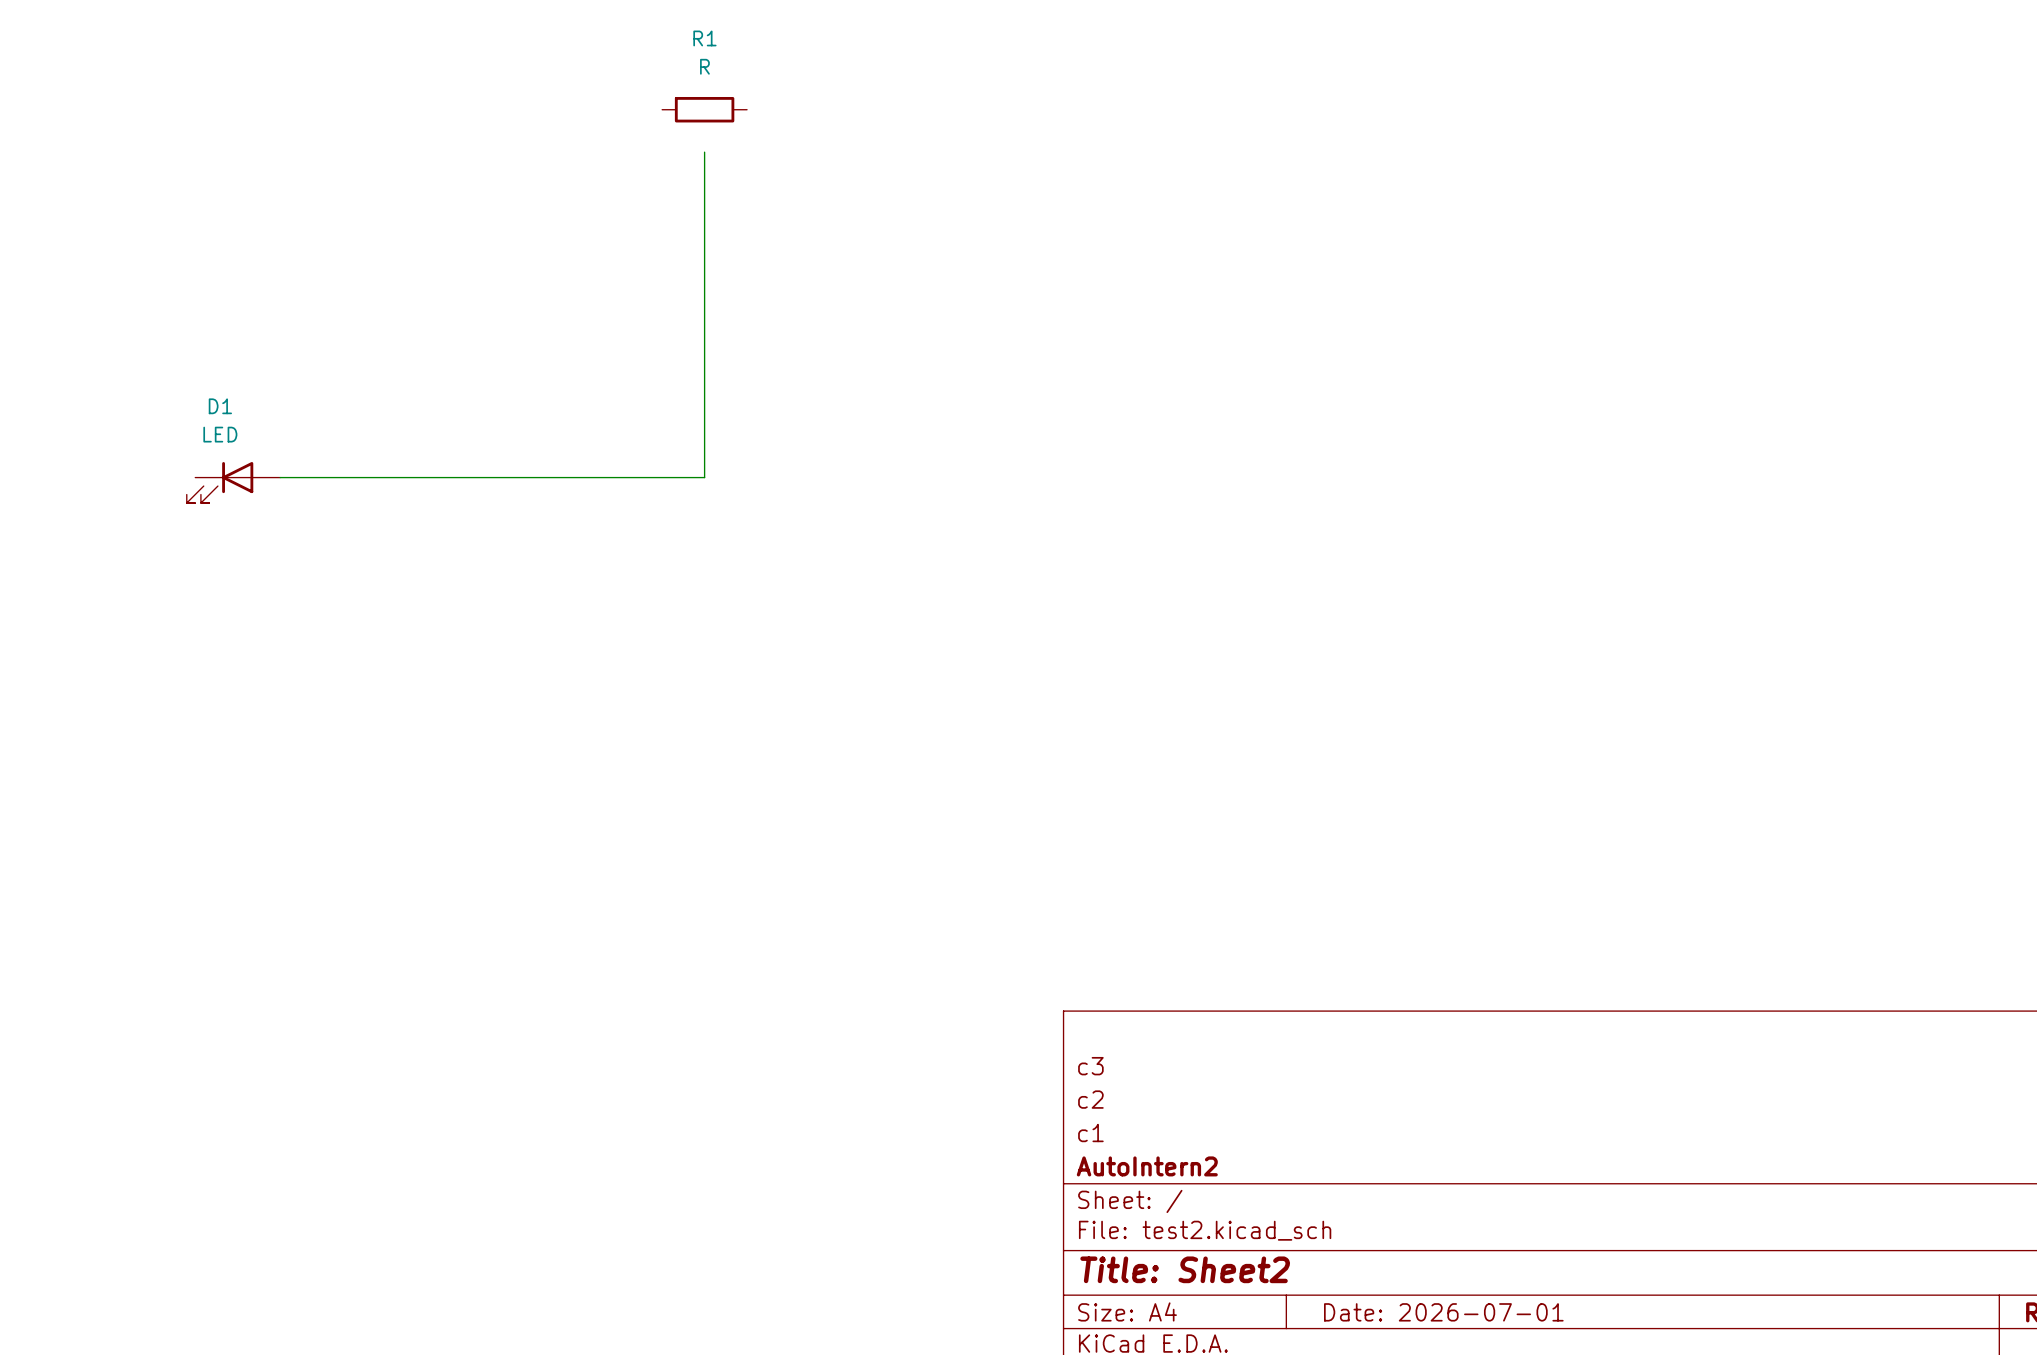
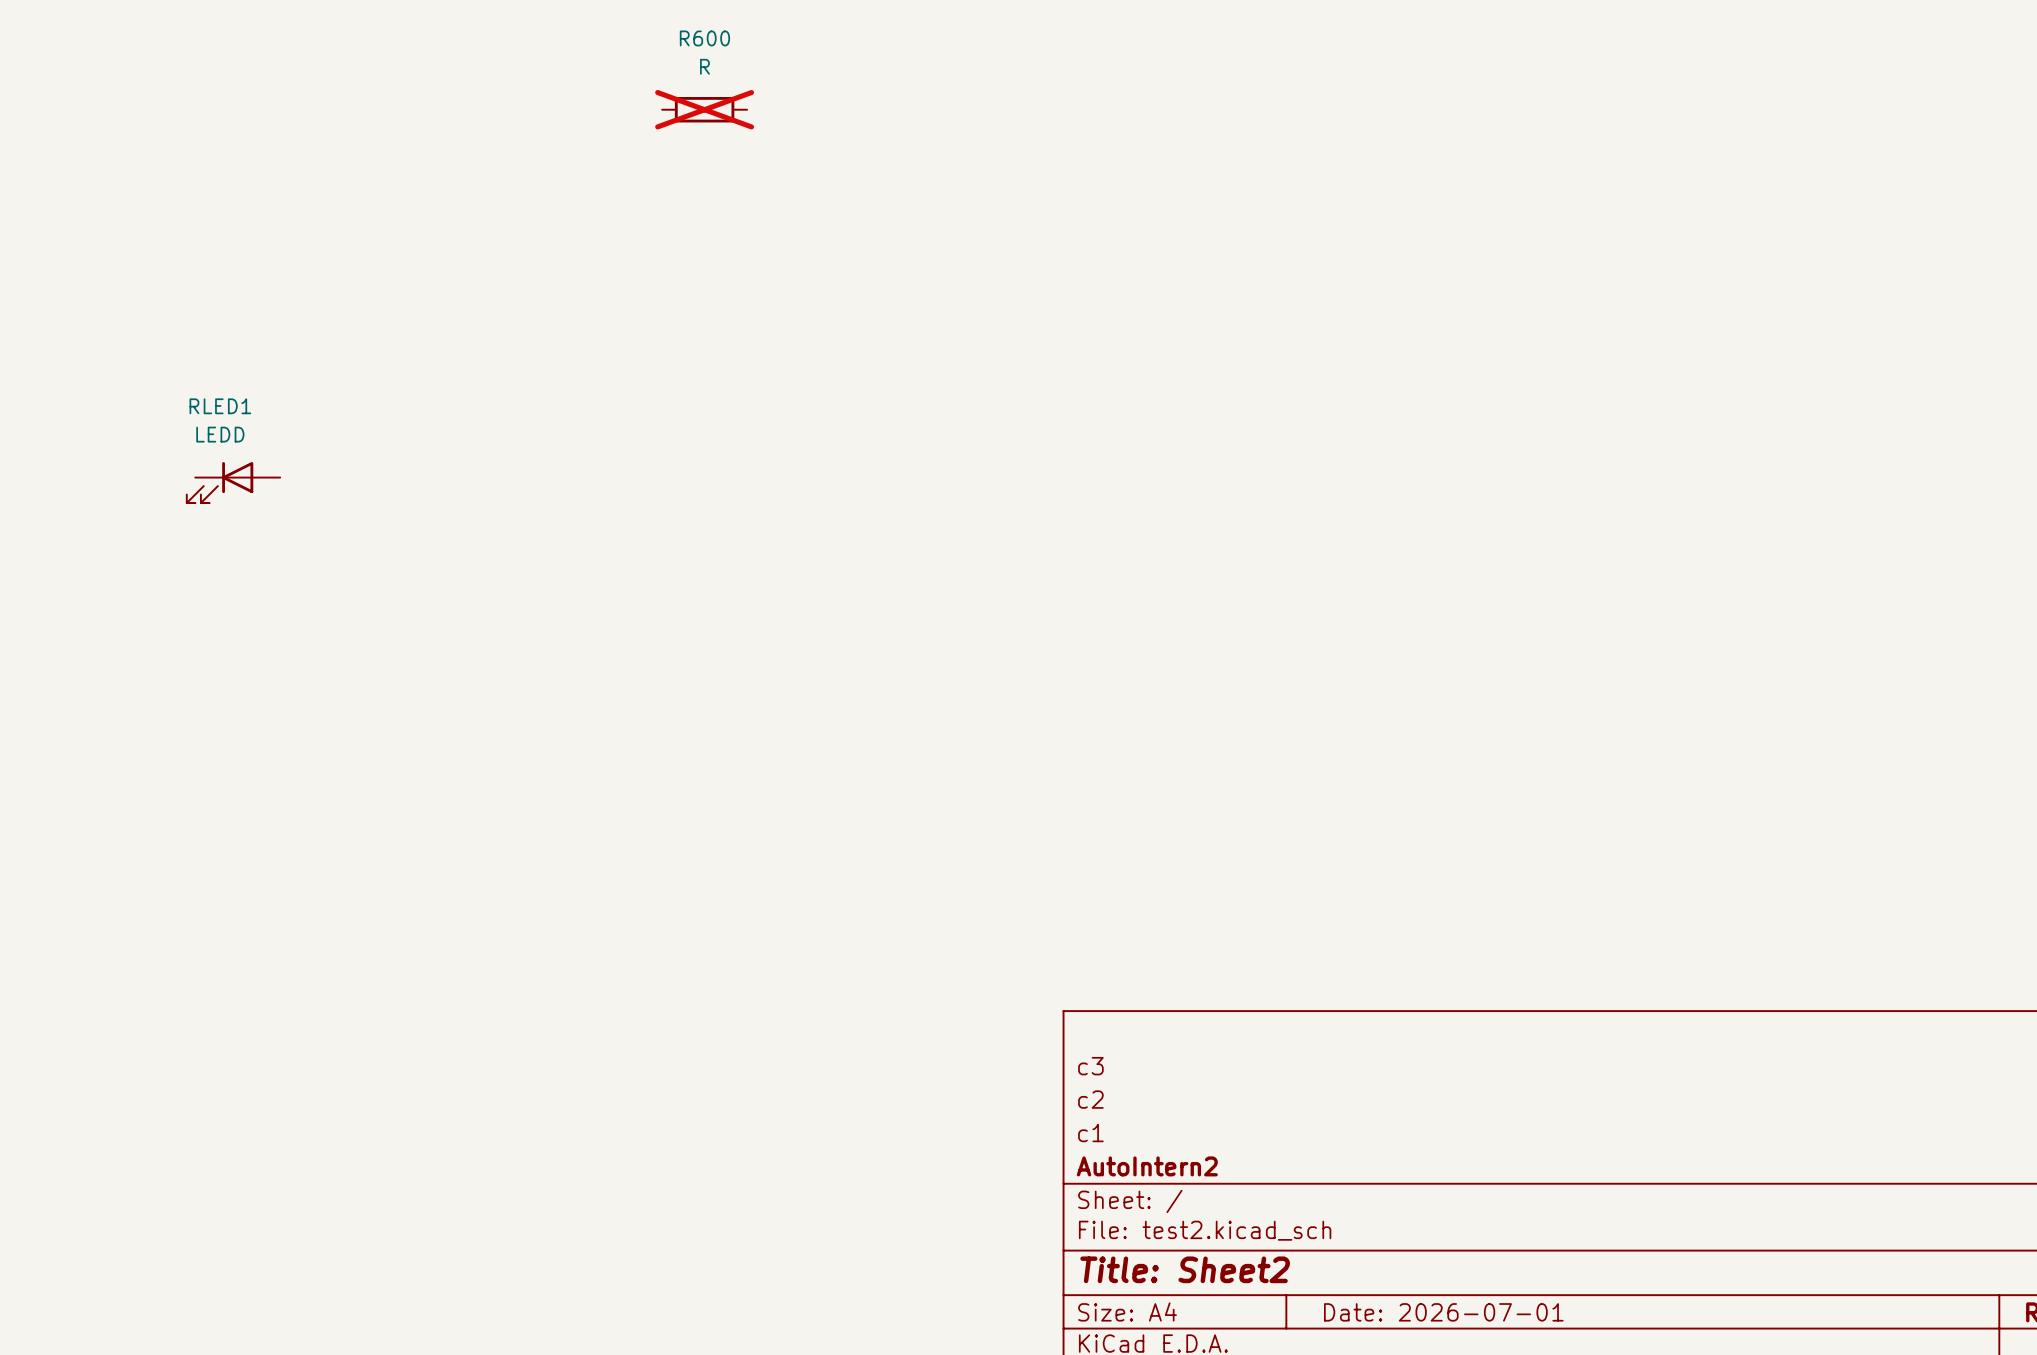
R1 name: R1 (704, 38) -> R600 (704, 38)
R1 do-not-place cross: none -> (704, 109)
wire: (704, 152) (704, 477) (280, 477) -> none
D1 name: D1 (220, 406) -> RLED1 (220, 406)
D1 value: LED (220, 434) -> LEDD (220, 434)

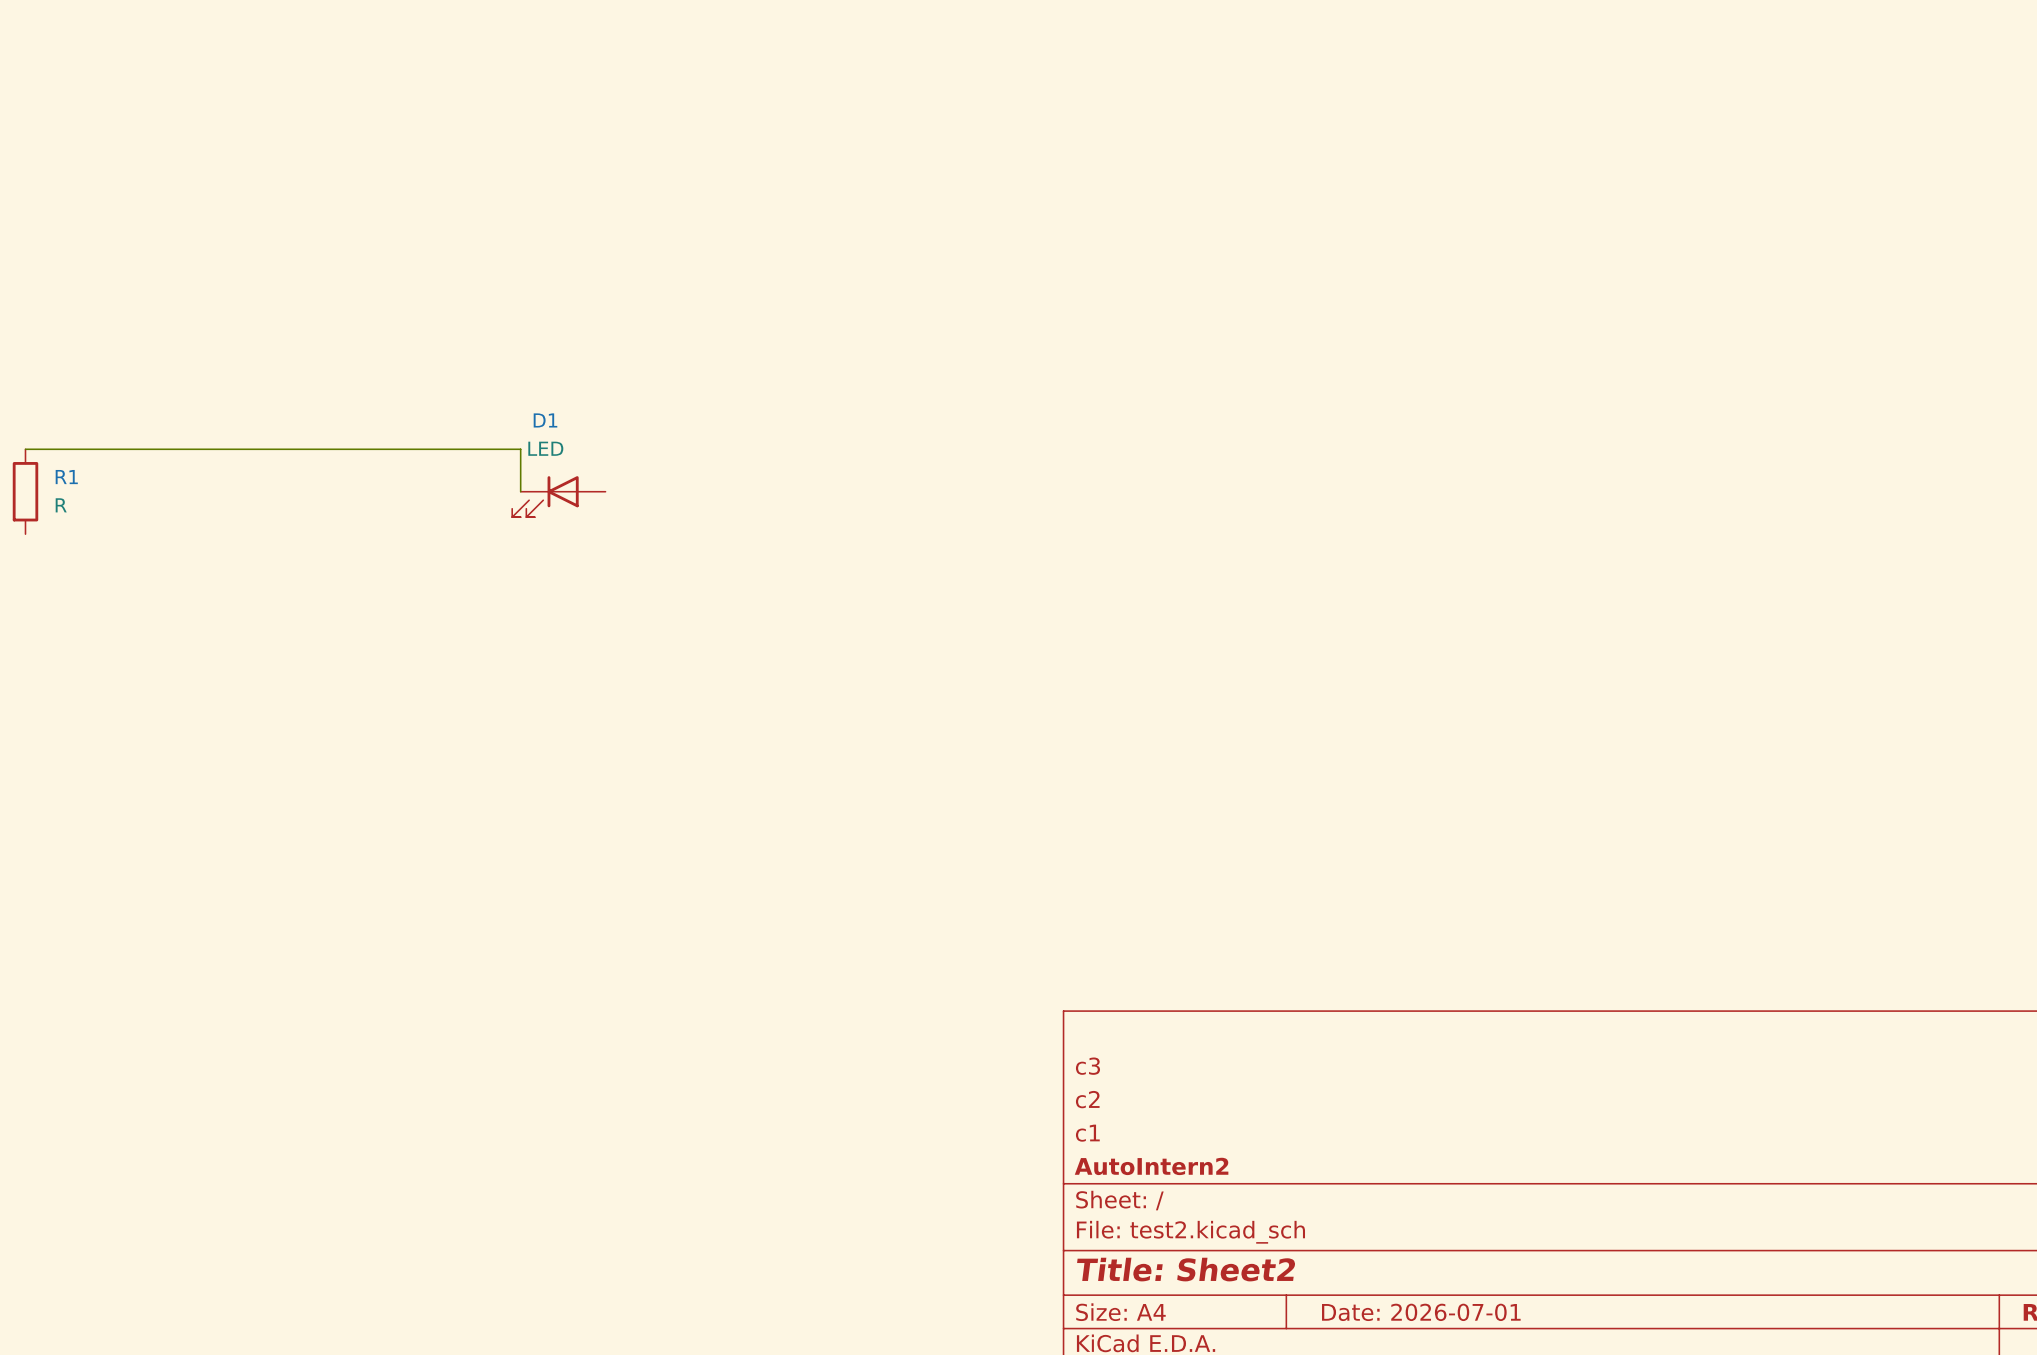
R600: R (704, 109) -> none
wire: none -> (25, 449) (520, 449) (520, 491)
RLED1: LEDD (233, 482) -> none
R1: none -> R (25, 491)
D1: none -> LED (558, 496)

